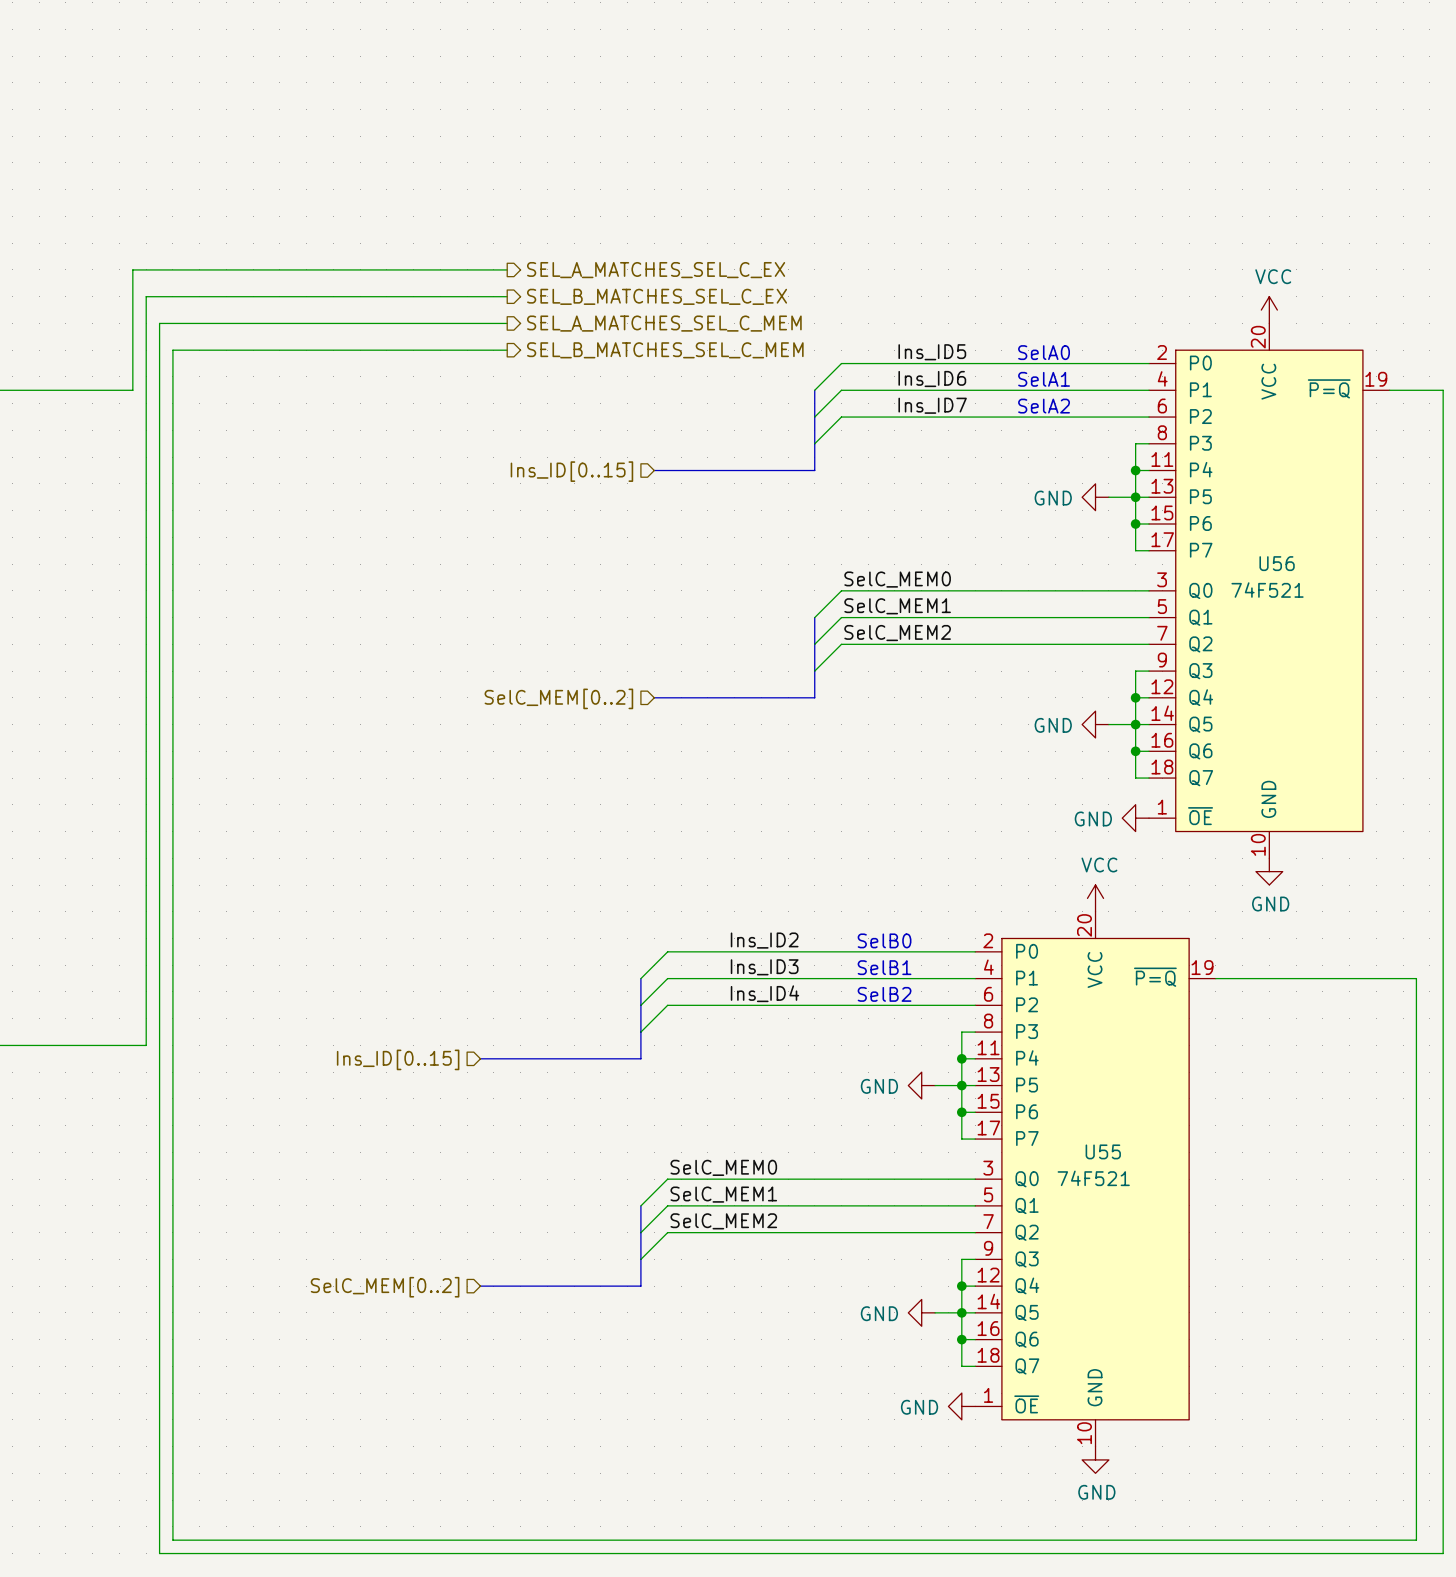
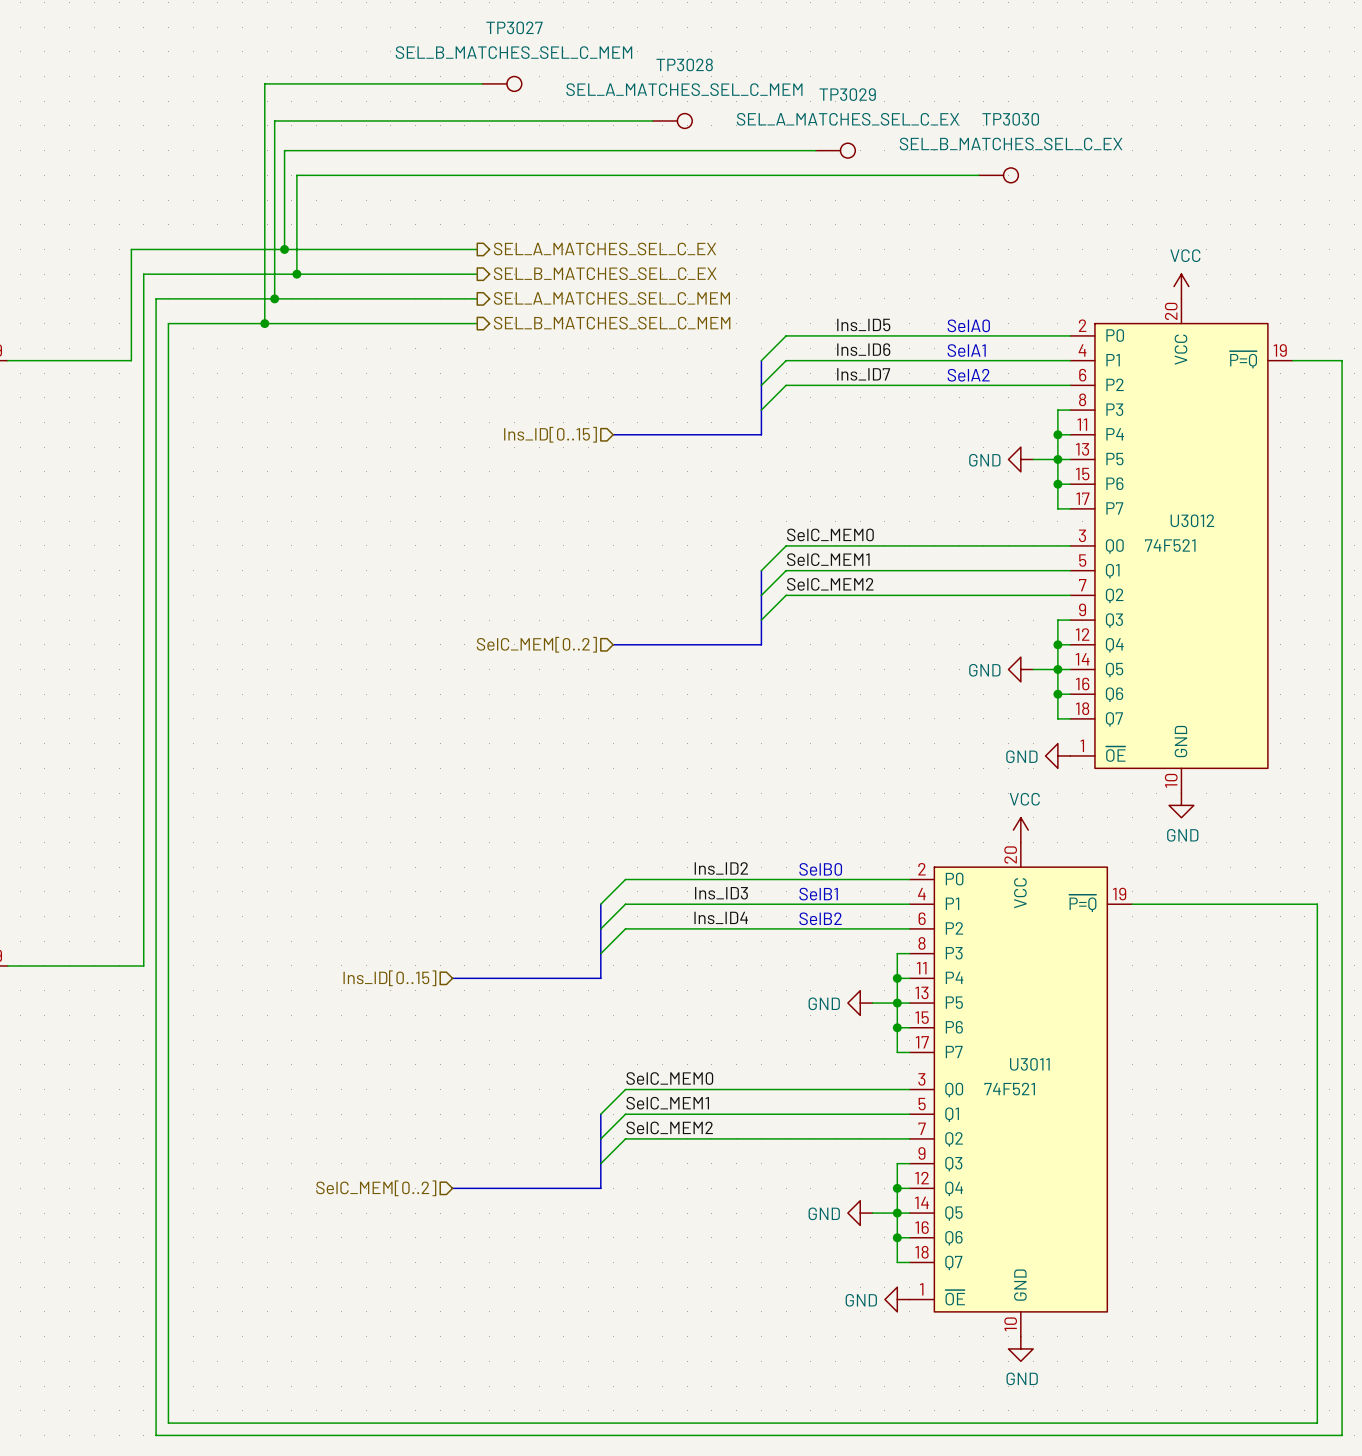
wire: none -> (482, 83) (264, 83) (264, 323)
TP3027: none -> SEL_B_MATCHES_SEL_C_MEM (501, 83)
wire: none -> (652, 120) (274, 120) (274, 298)
TP3028: none -> SEL_A_MATCHES_SEL_C_MEM (672, 120)
wire: none -> (815, 150) (284, 150) (284, 249)
TP3029: none -> SEL_A_MATCHES_SEL_C_EX (835, 150)
wire: none -> (978, 175) (296, 175) (296, 274)
TP3030: none -> SEL_B_MATCHES_SEL_C_EX (998, 175)
junction: none -> (284, 249)
junction: none -> (296, 274)
junction: none -> (274, 298)
junction: none -> (264, 323)
U56 name: U56 (1277, 563) -> U3012 (1192, 520)
U55 name: U55 (1103, 1151) -> U3011 (1029, 1064)

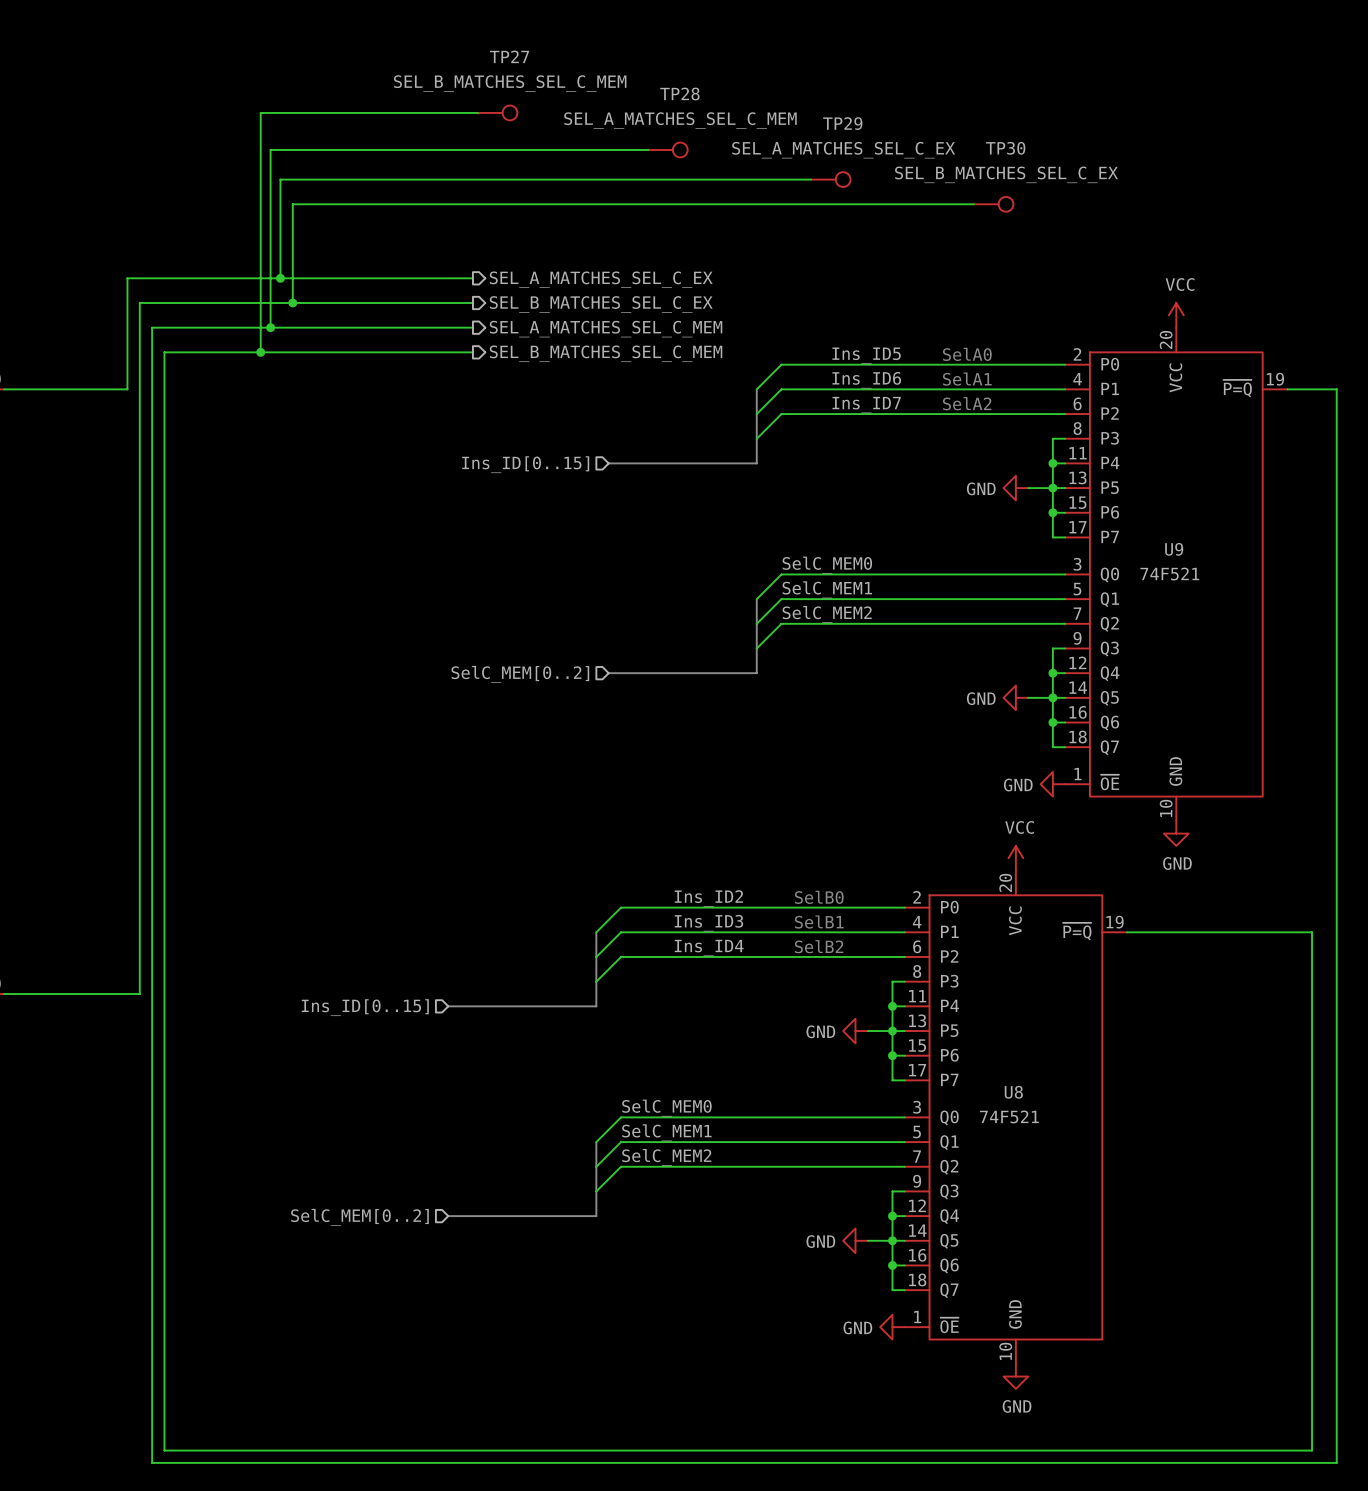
TP3027 name: TP3027 (514, 27) -> TP27 (509, 56)
TP3028 name: TP3028 (684, 64) -> TP28 (679, 94)
TP3029 name: TP3029 (847, 94) -> TP29 (842, 123)
TP3030 name: TP3030 (1010, 119) -> TP30 (1005, 148)
U3012 name: U3012 (1192, 520) -> U9 (1174, 549)
U3011 name: U3011 (1029, 1064) -> U8 (1013, 1092)

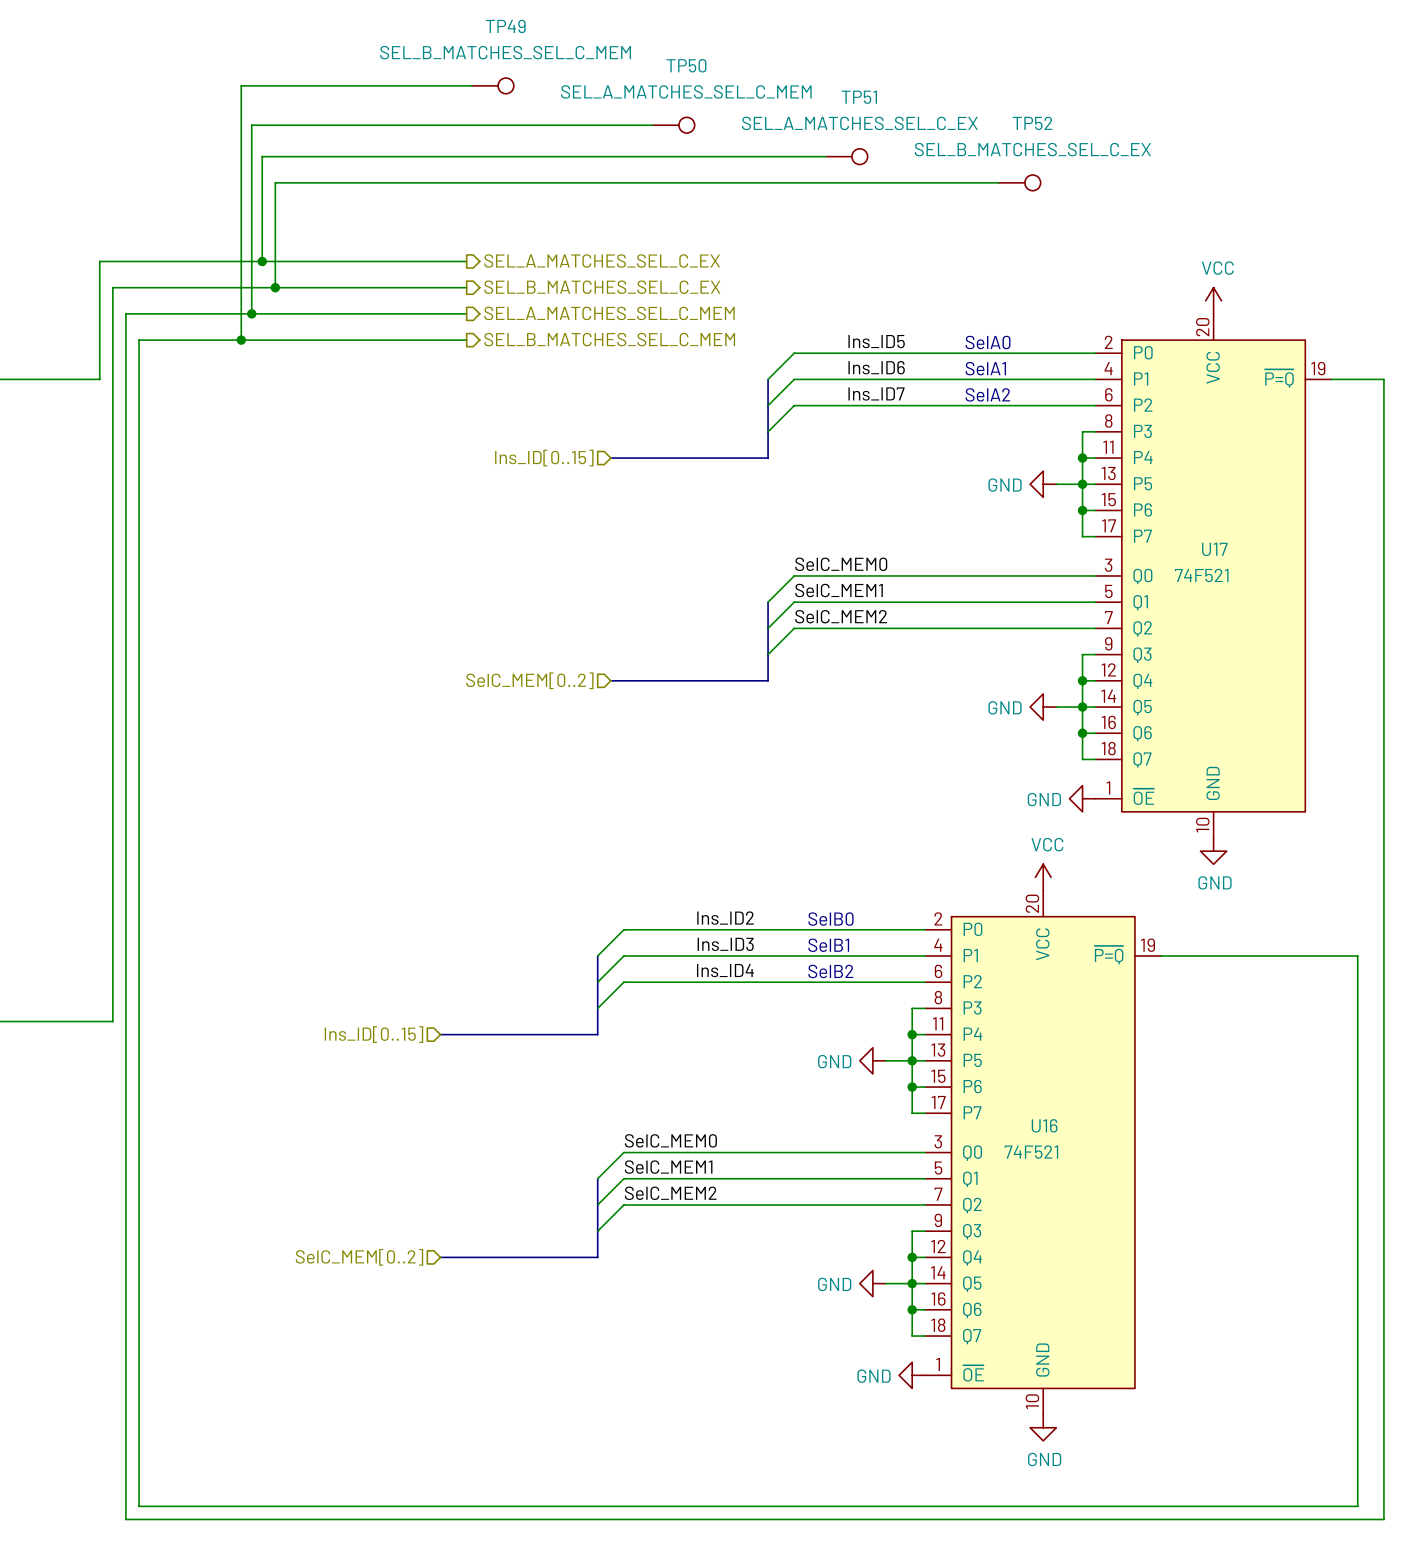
TP27 name: TP27 (509, 56) -> TP49 (505, 26)
TP28 name: TP28 (679, 94) -> TP50 (686, 65)
TP29 name: TP29 (842, 123) -> TP51 (859, 97)
TP30 name: TP30 (1005, 148) -> TP52 (1032, 123)
U9 name: U9 (1174, 549) -> U17 (1214, 549)
U8 name: U8 (1013, 1092) -> U16 (1044, 1125)

